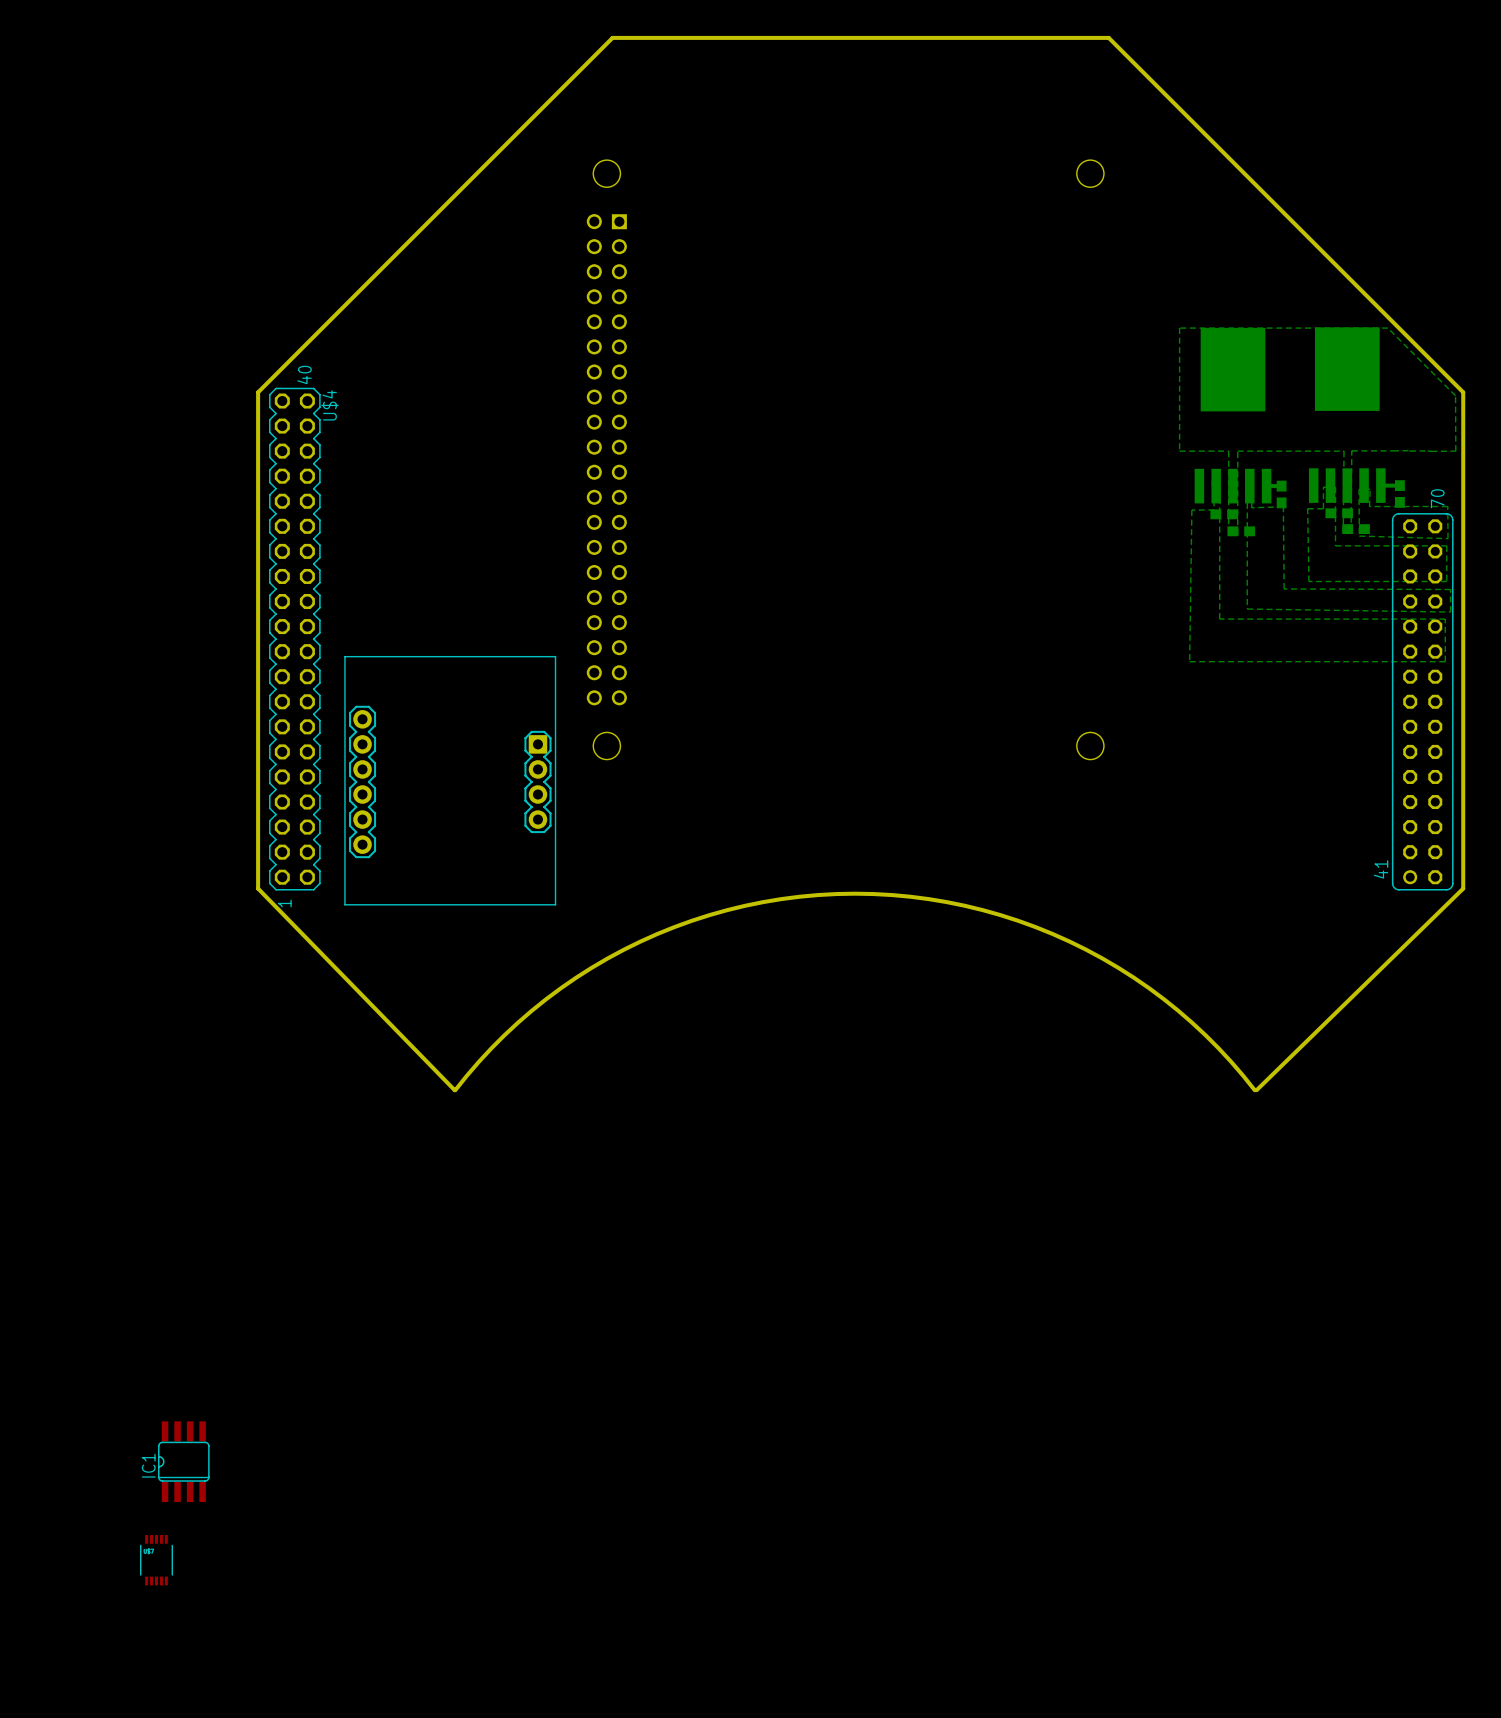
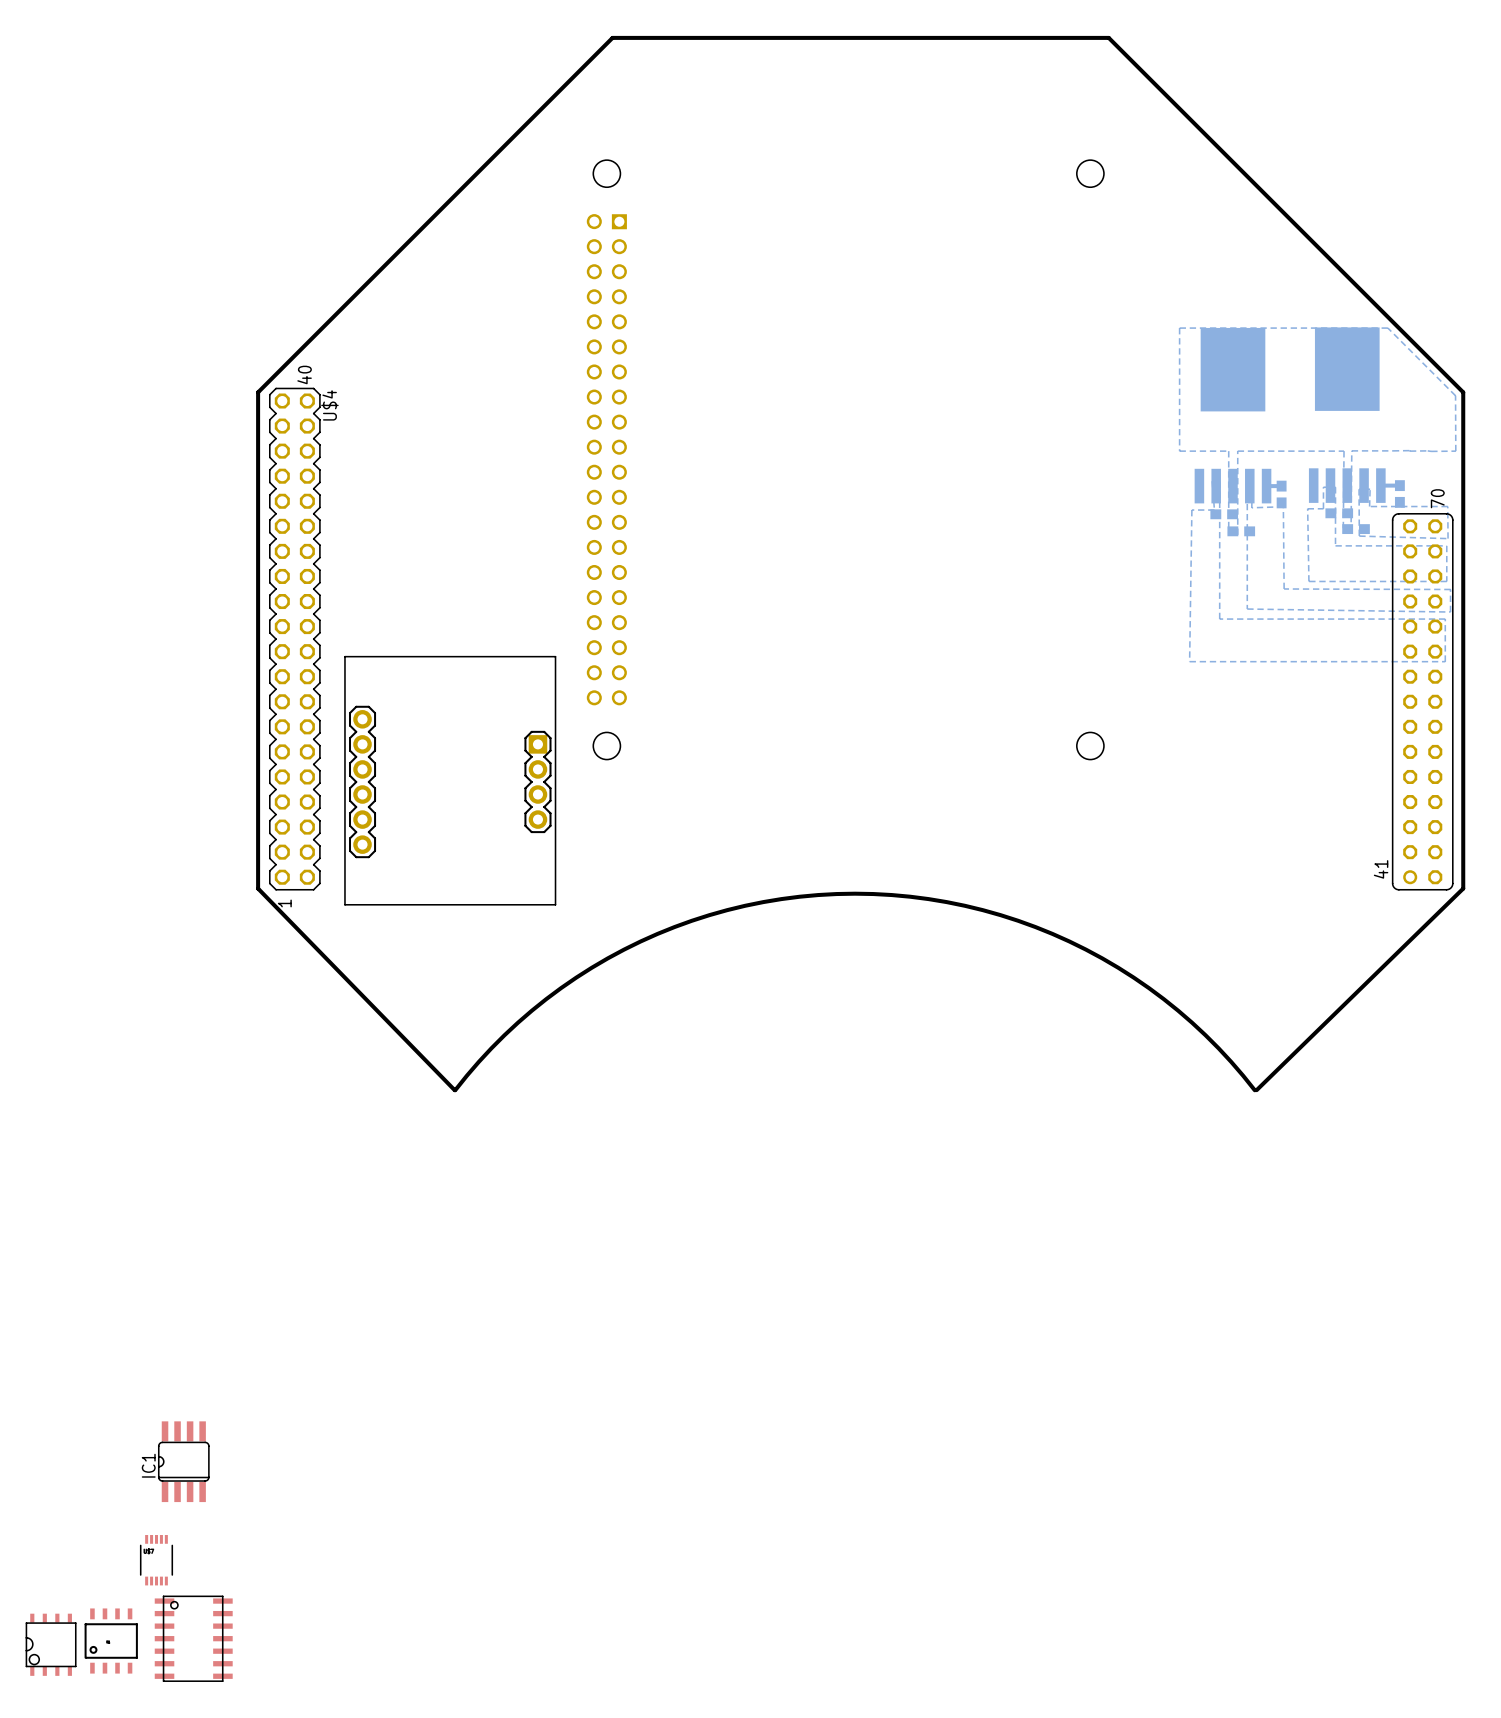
part: none -> (193, 1638)
part: none -> (111, 1641)
part: none -> (51, 1644)

